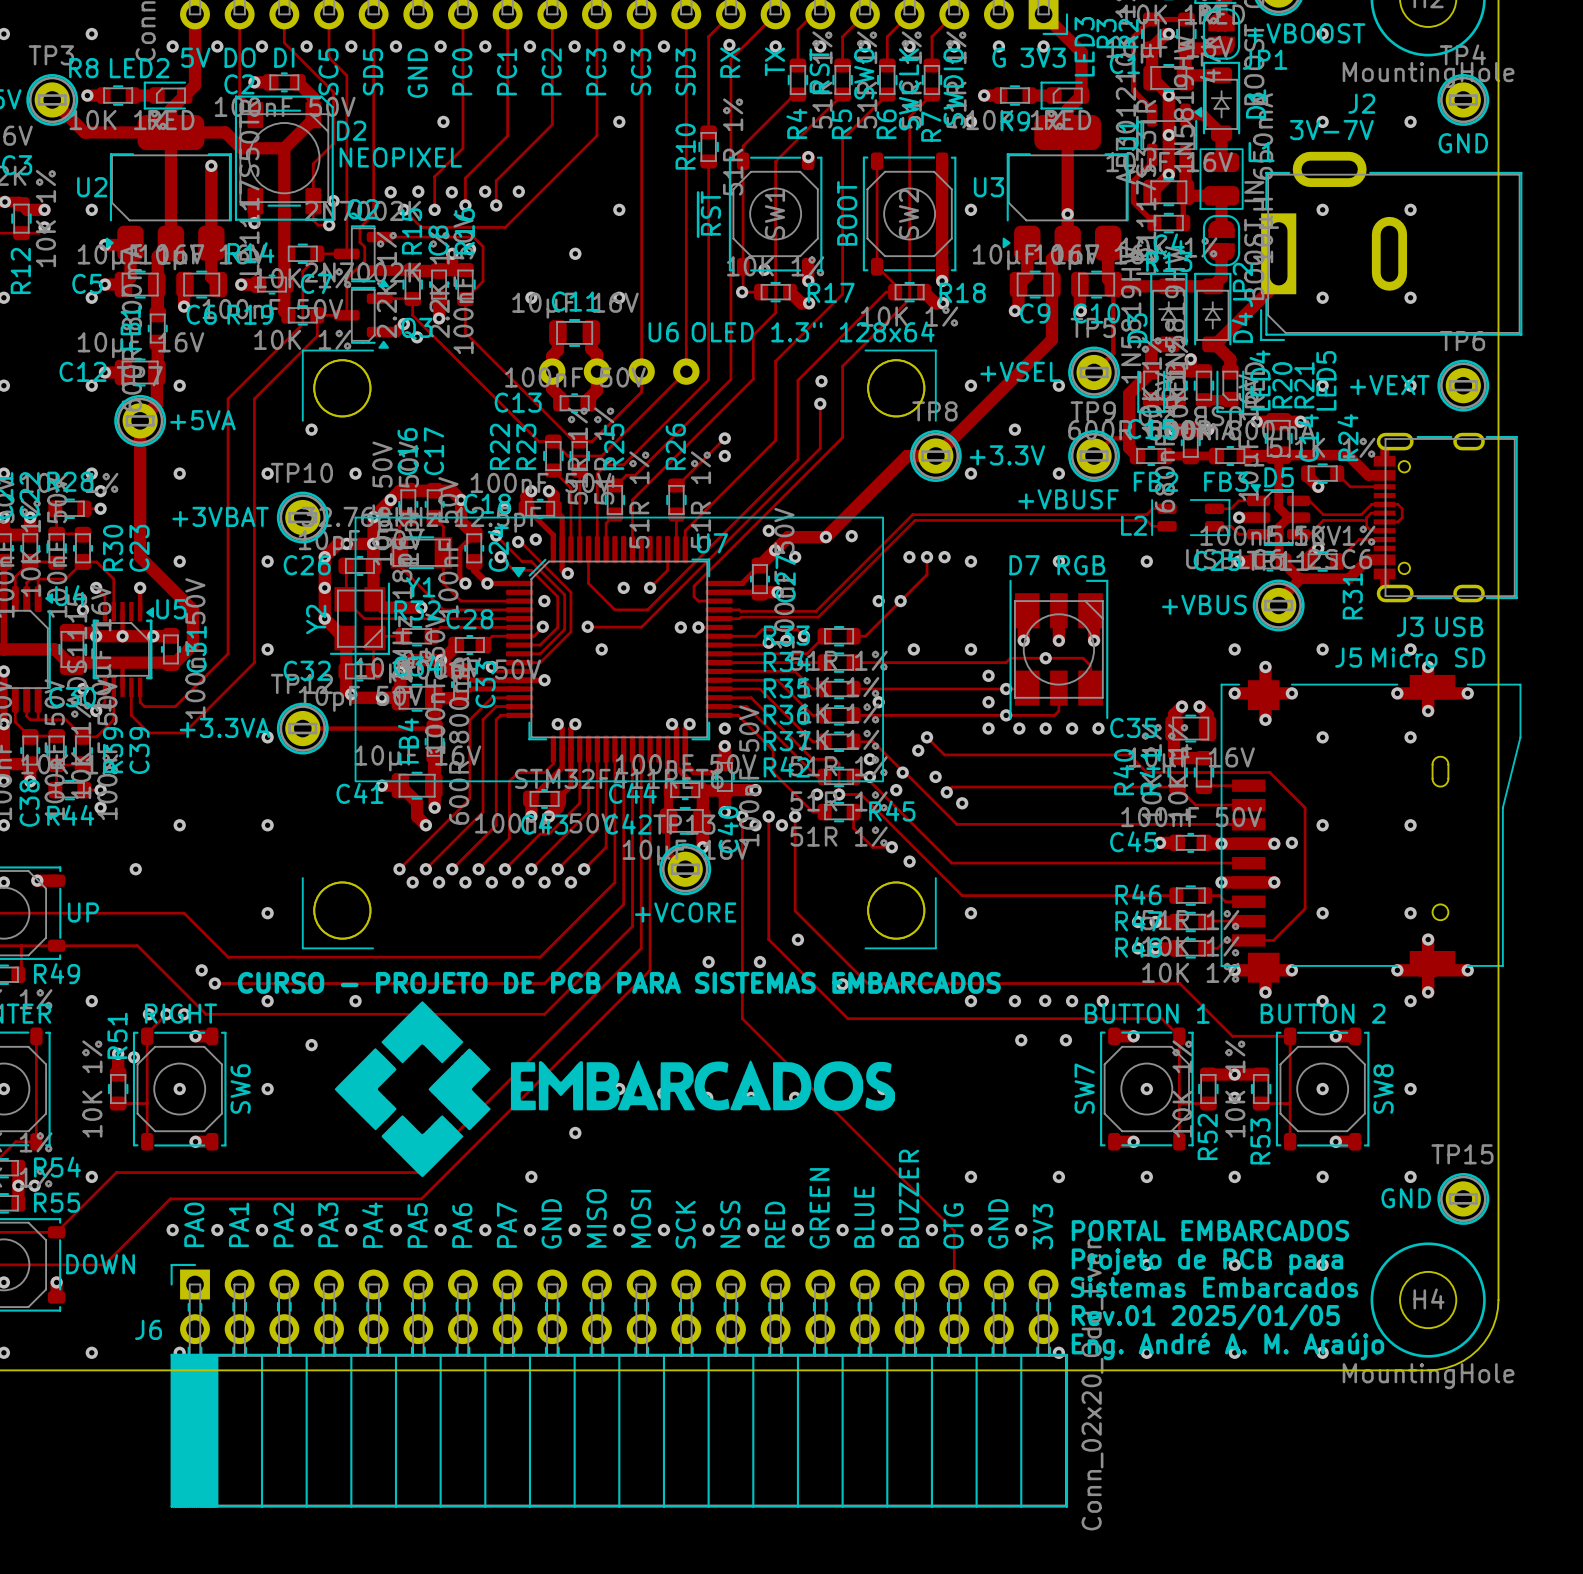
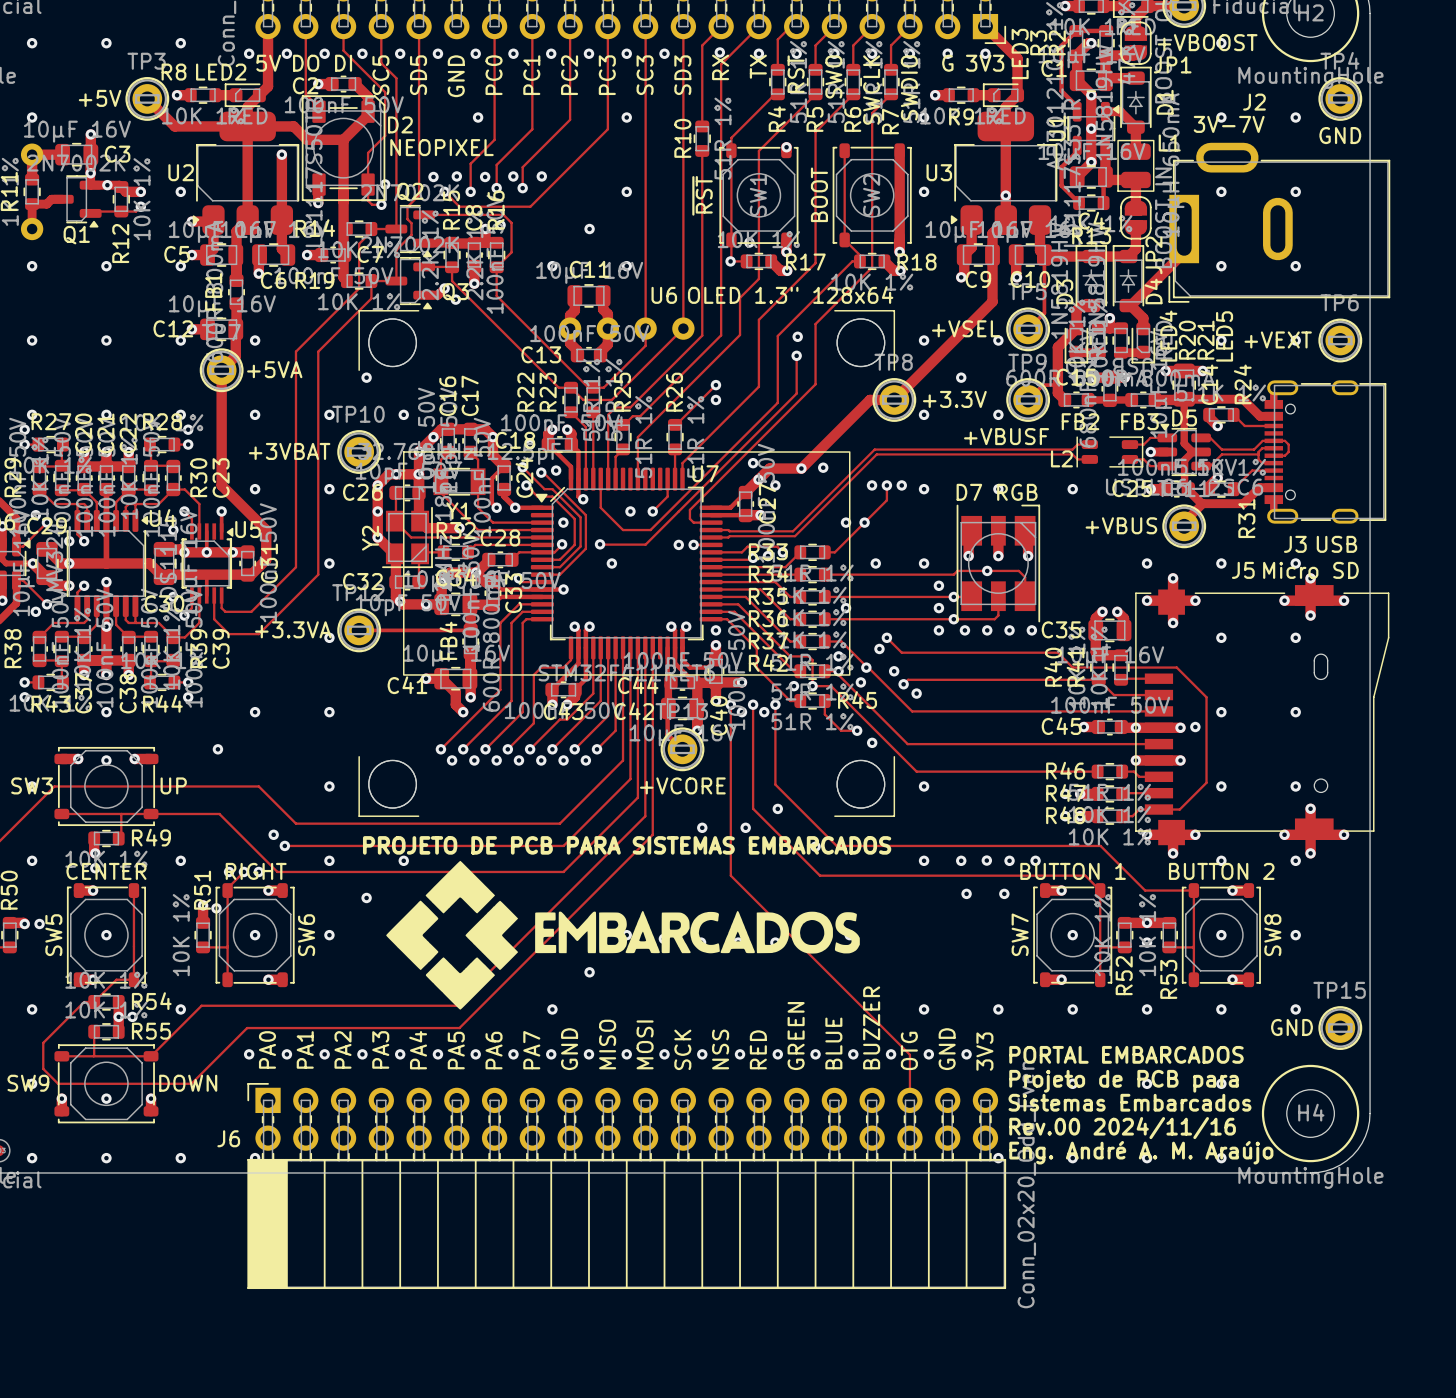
text: CURSO - PROJETO DE PCB PARA SISTEMAS EMBARCADOS (619, 982) -> PROJETO DE PCB PARA SISTEMAS EMBARCADOS (627, 845)
text: Rev.01 2025/01/05 (1205, 1317) -> Rev.00 2024/11/16 (1122, 1128)

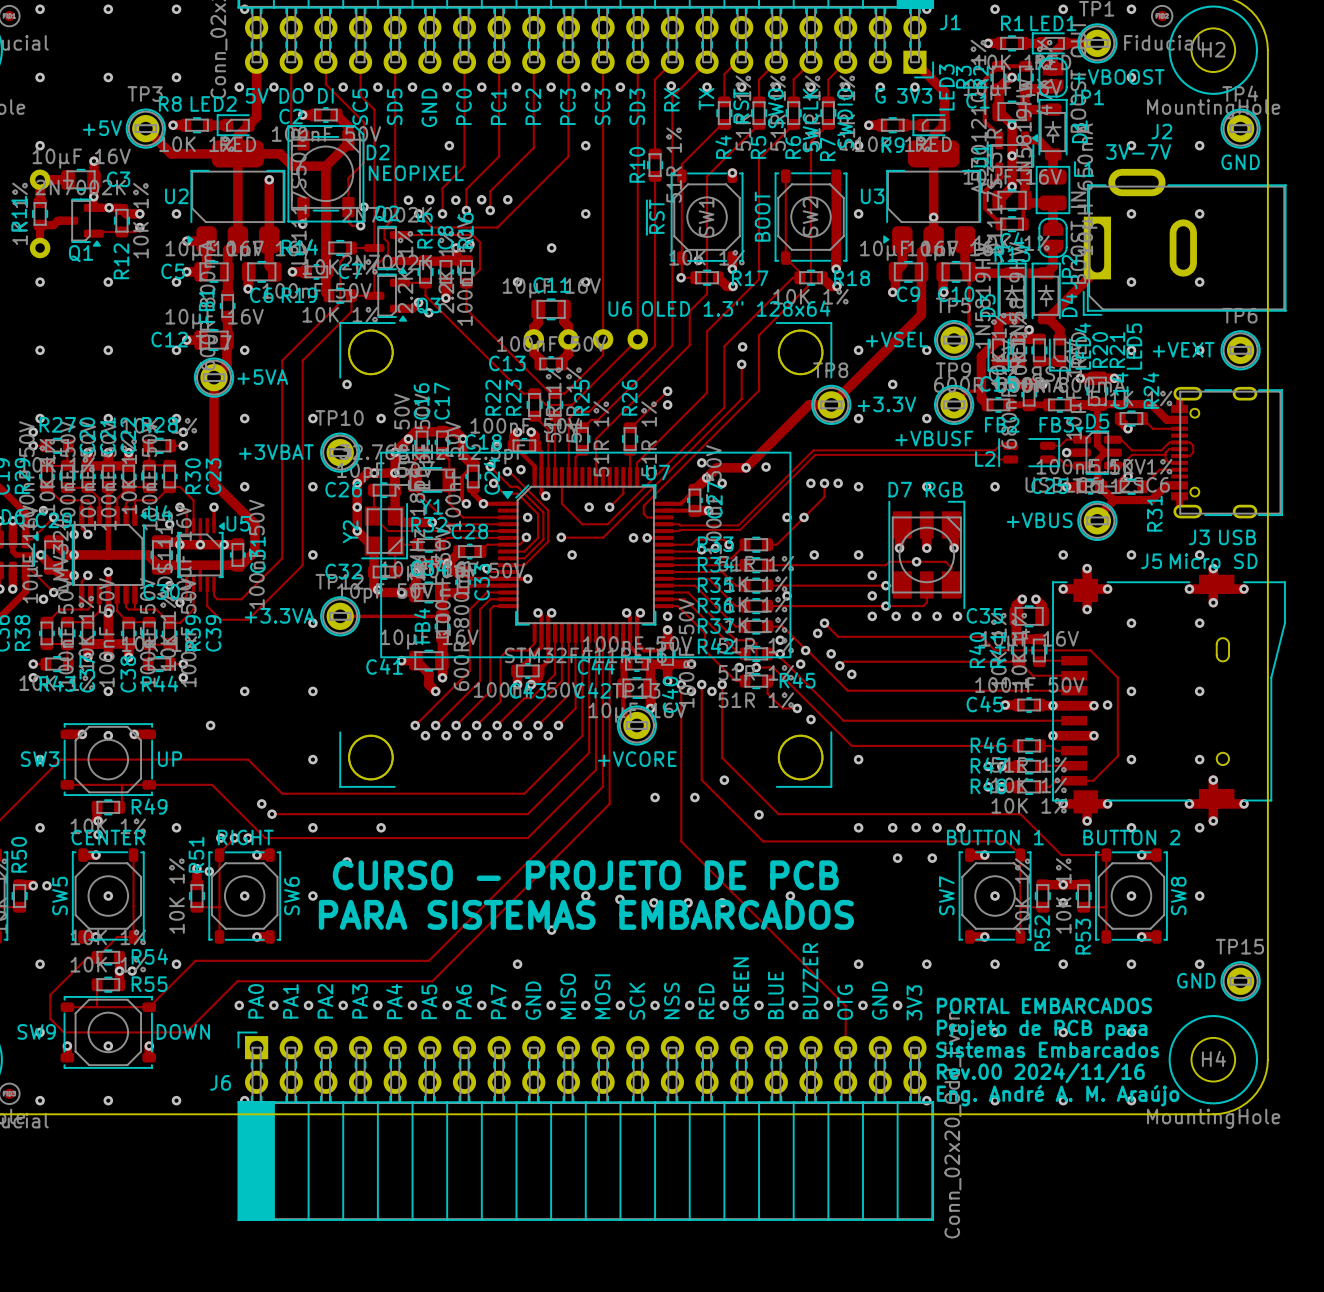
text: PROJETO DE PCB PARA SISTEMAS EMBARCADOS (627, 845) -> none
drawing: [386, 860, 860, 1010] -> none
text: none -> CURSO - PROJETO DE PCB (585, 875)
text: none -> PARA SISTEMAS EMBARCADOS (586, 914)

